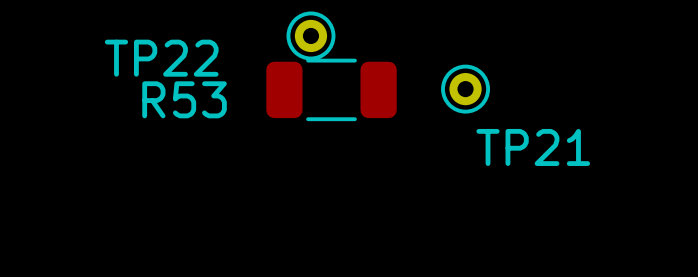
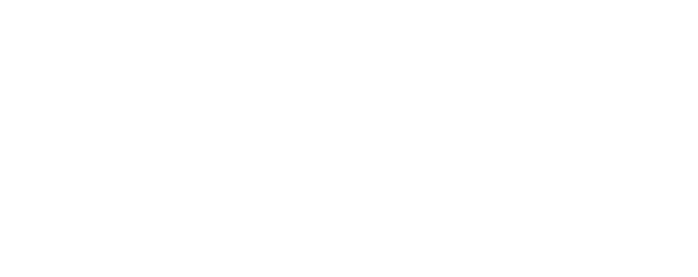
TP22: (310, 35) -> none
R53: (331, 89) -> none
TP21: (465, 89) -> none

